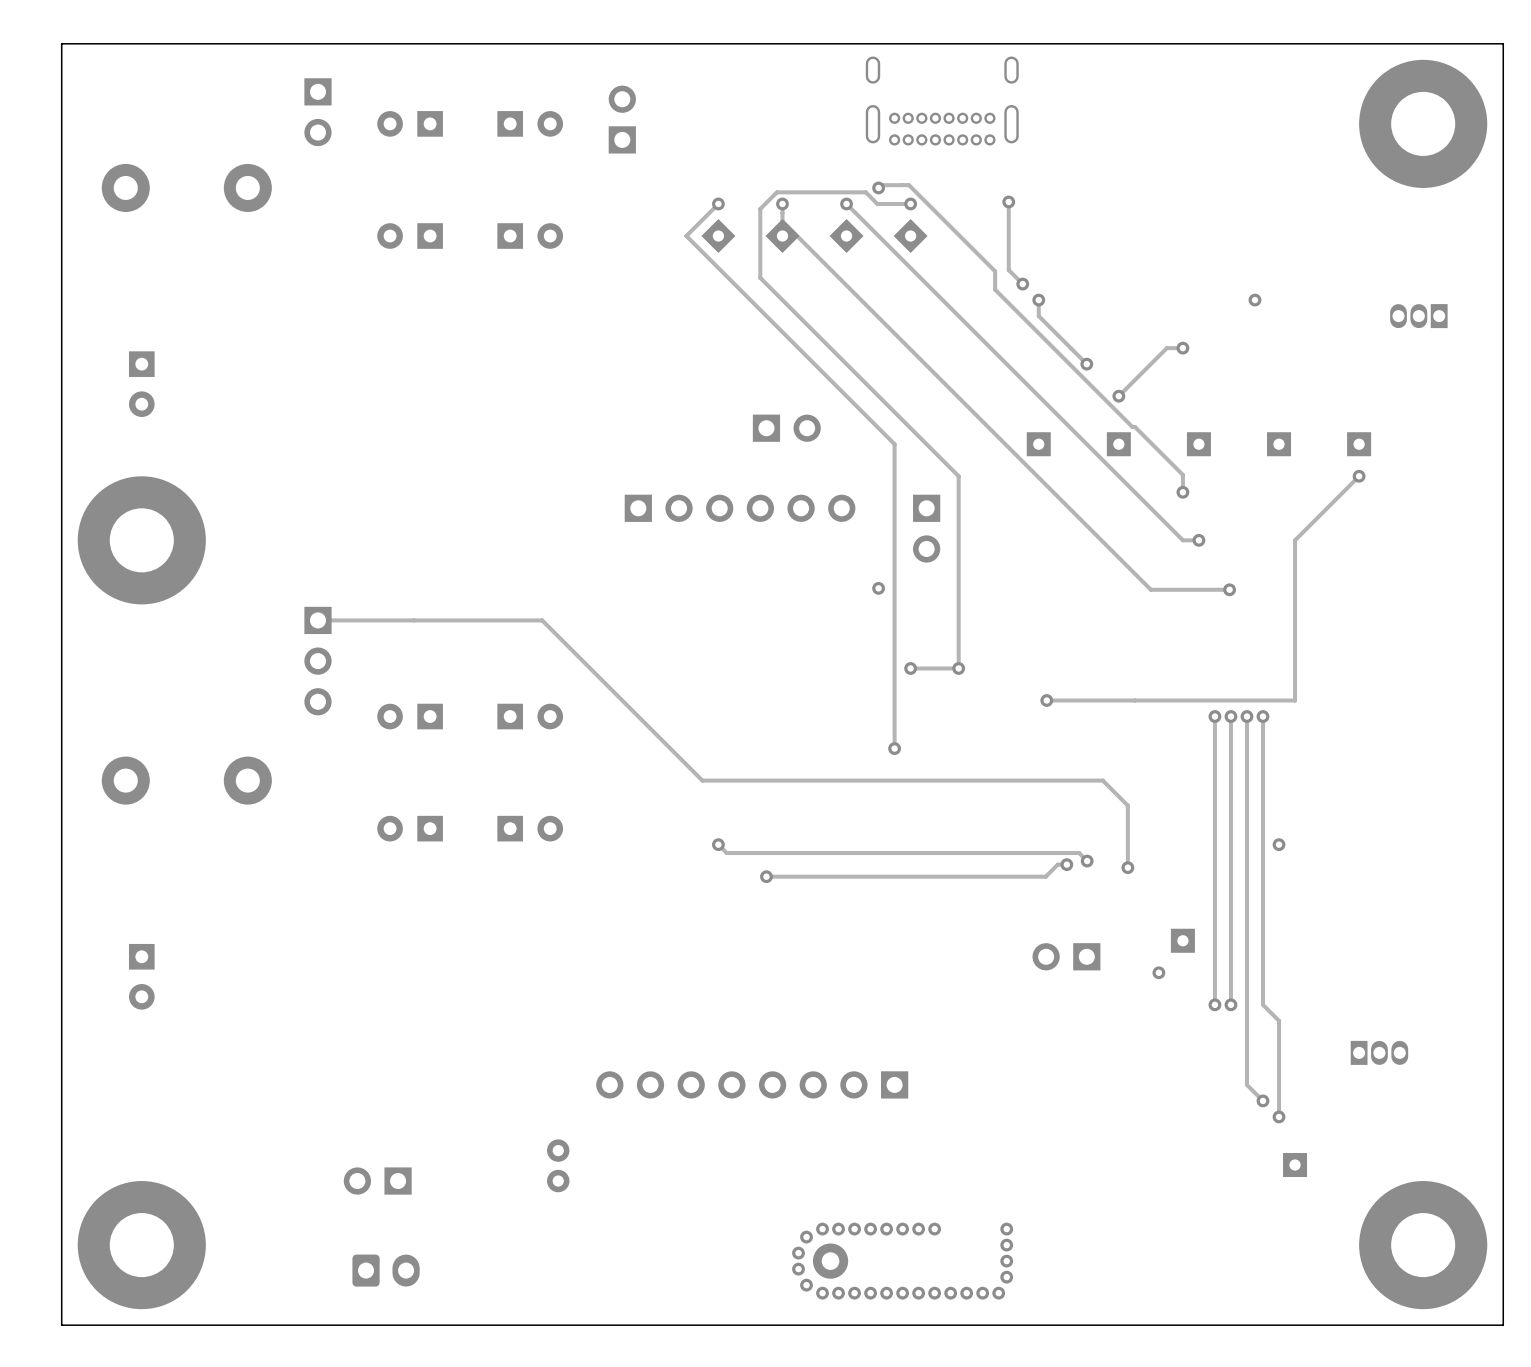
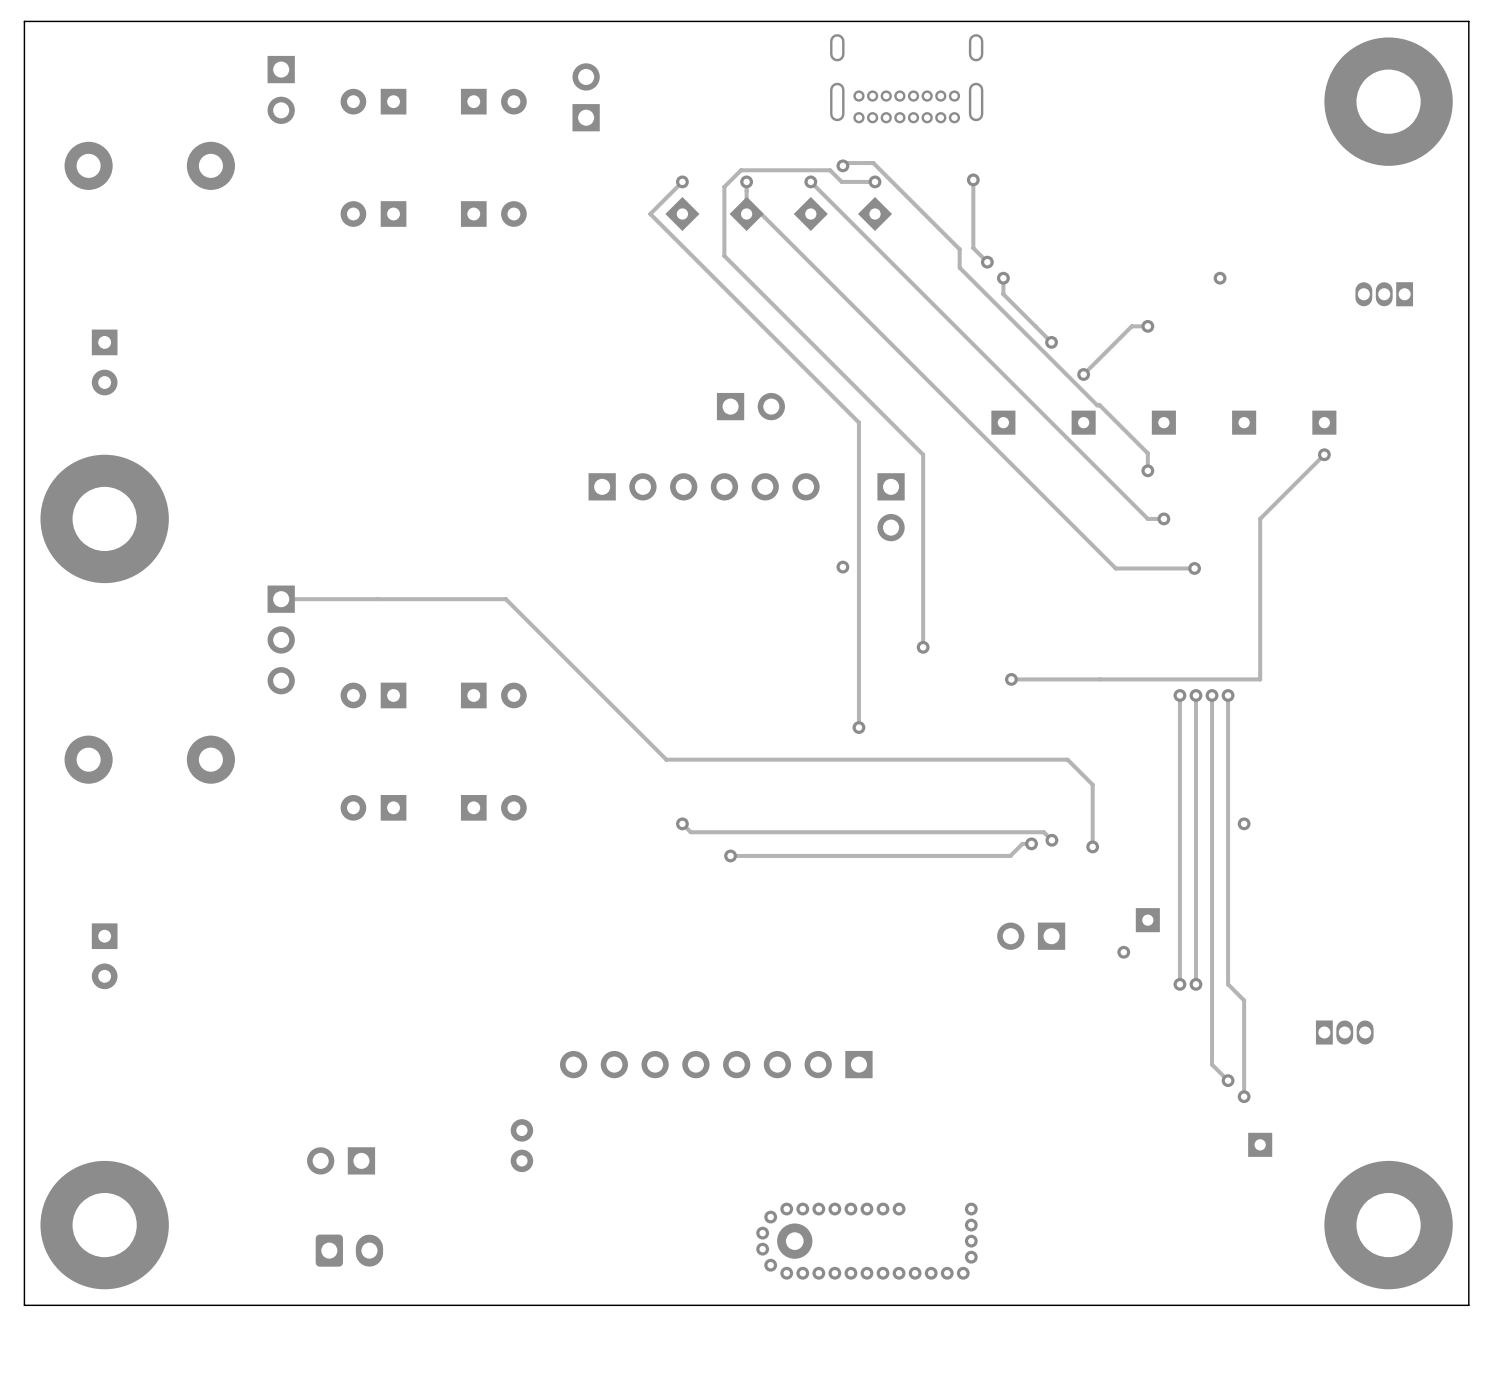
via: (910, 668) -> none
track: (958, 668) (910, 668) -> none

